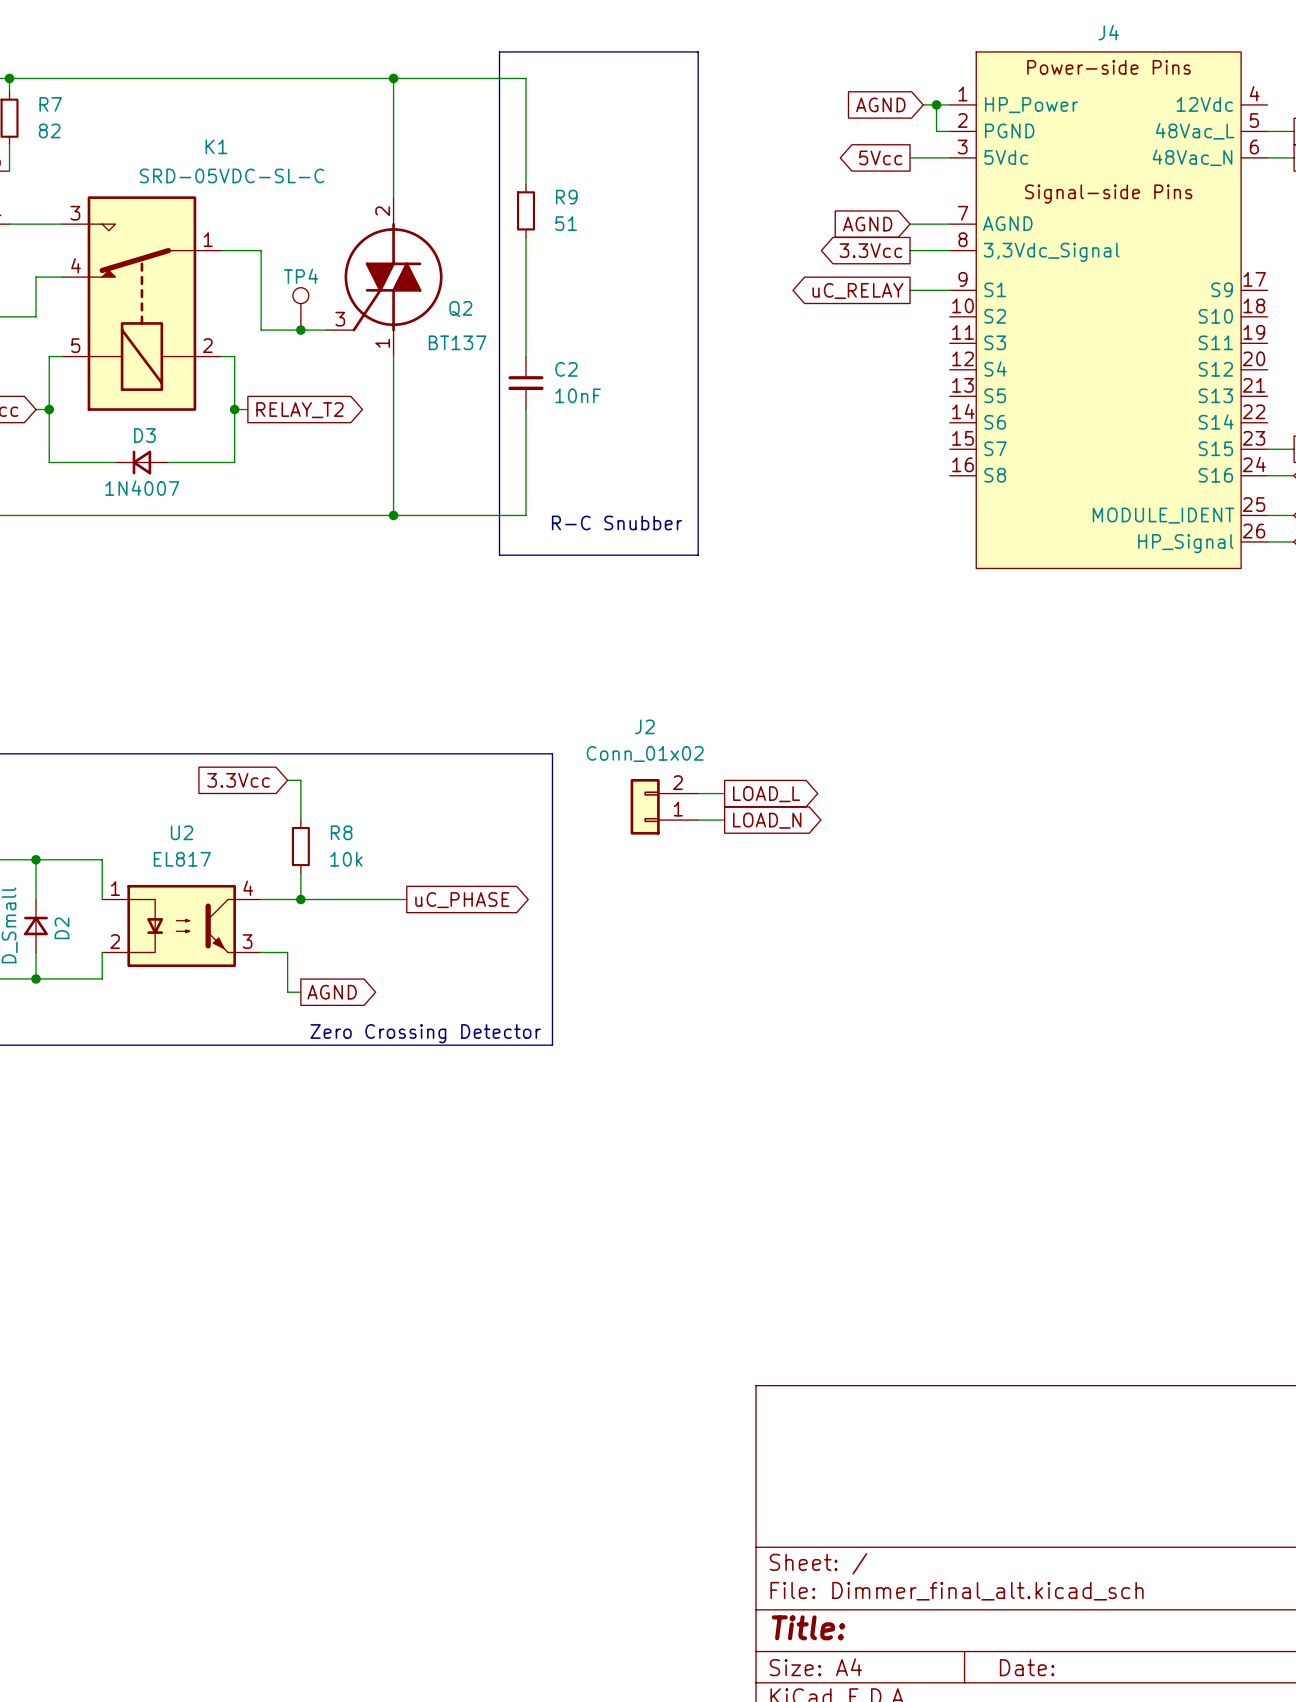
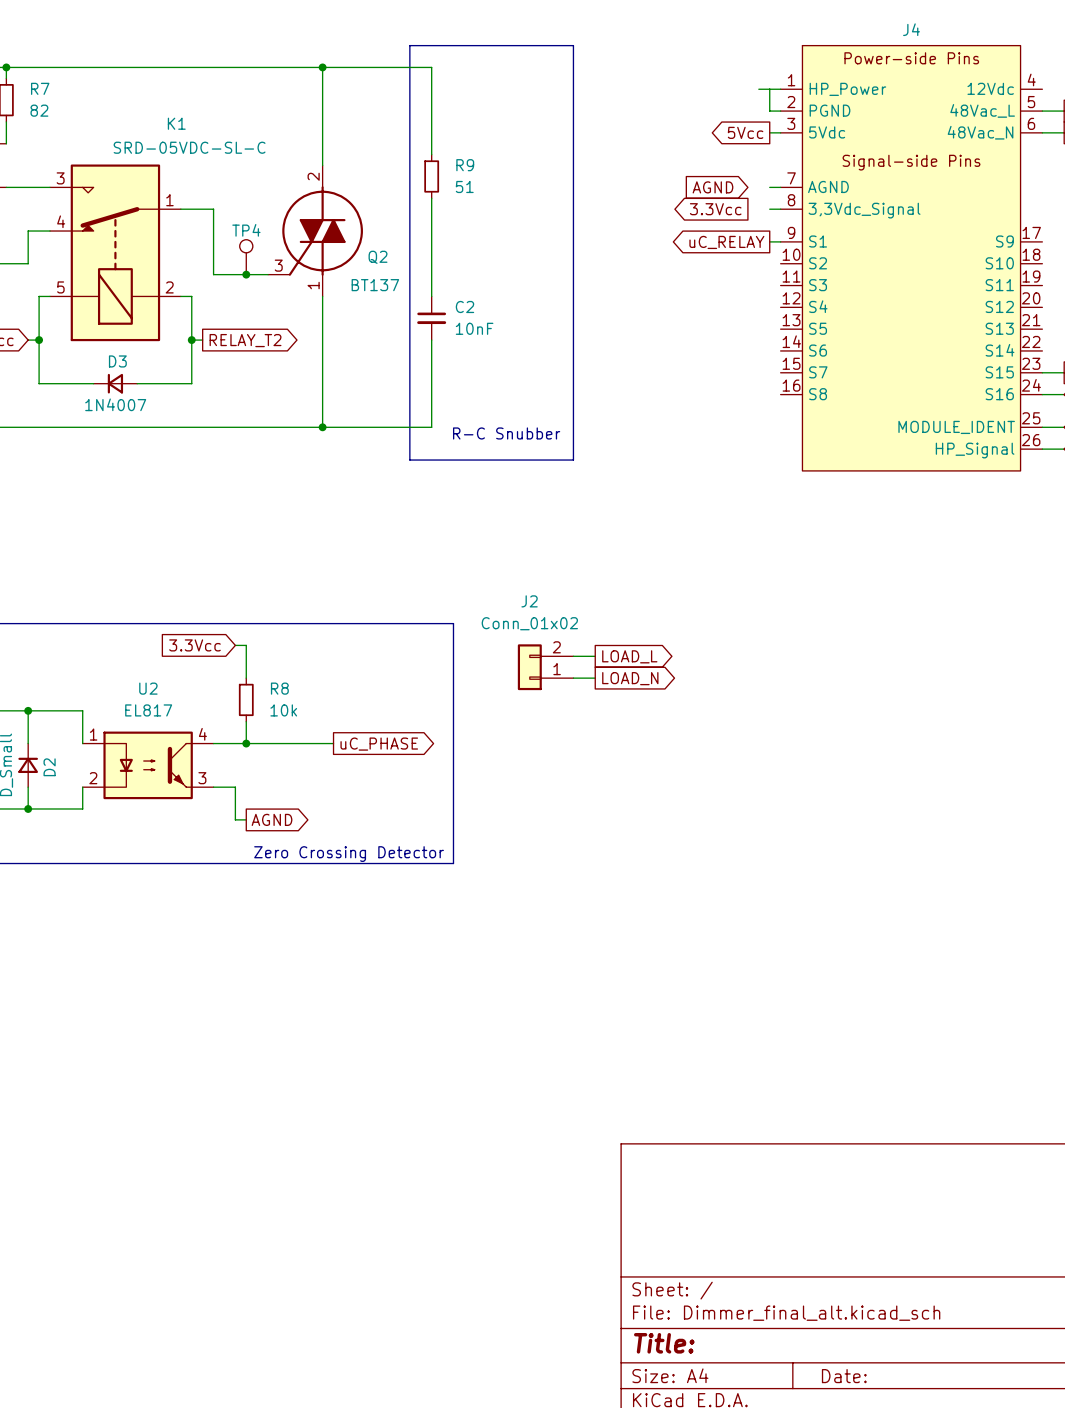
global label: AGND (880, 104) -> none
junction: (936, 104) -> none
global label position: 5Vcc (880, 157) -> 5Vcc (745, 132)
wire: (910, 157) (936, 157) -> none
wire: (910, 224) (936, 224) -> none
wire: (910, 250) (936, 250) -> none
global label position: uC_RELAY (857, 290) -> uC_RELAY (726, 242)
wire: (910, 290) (936, 290) -> none

